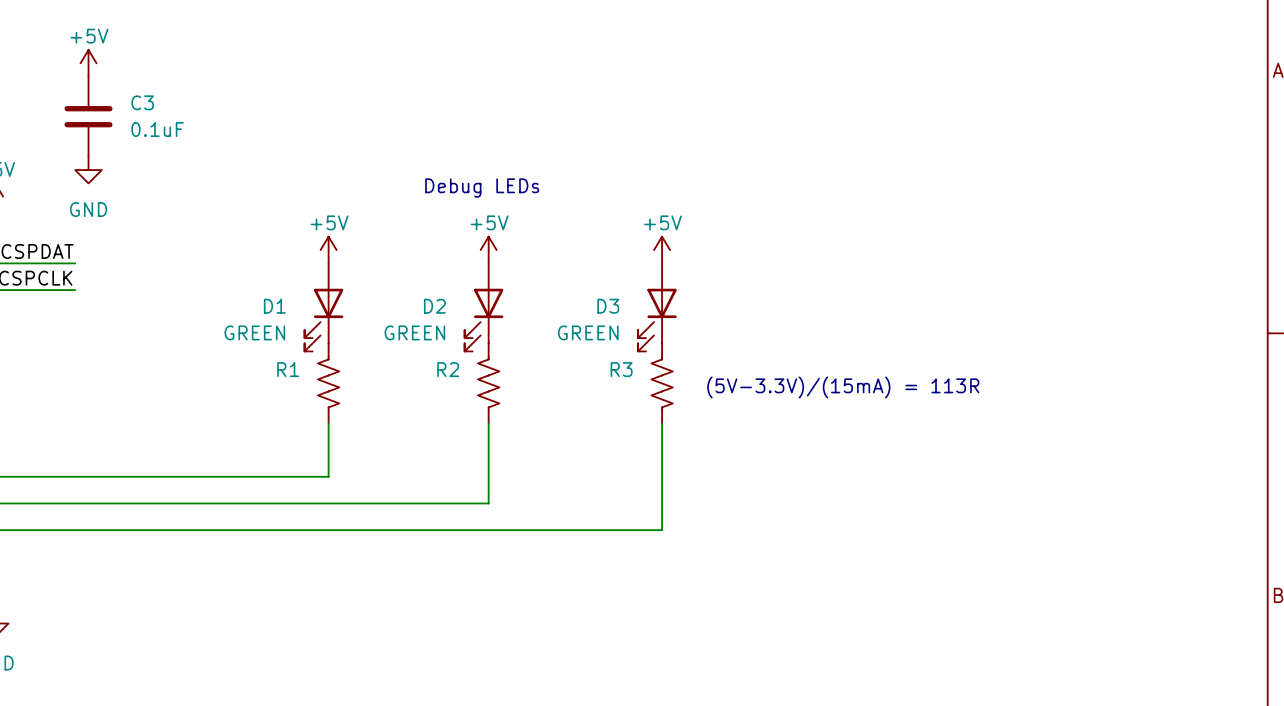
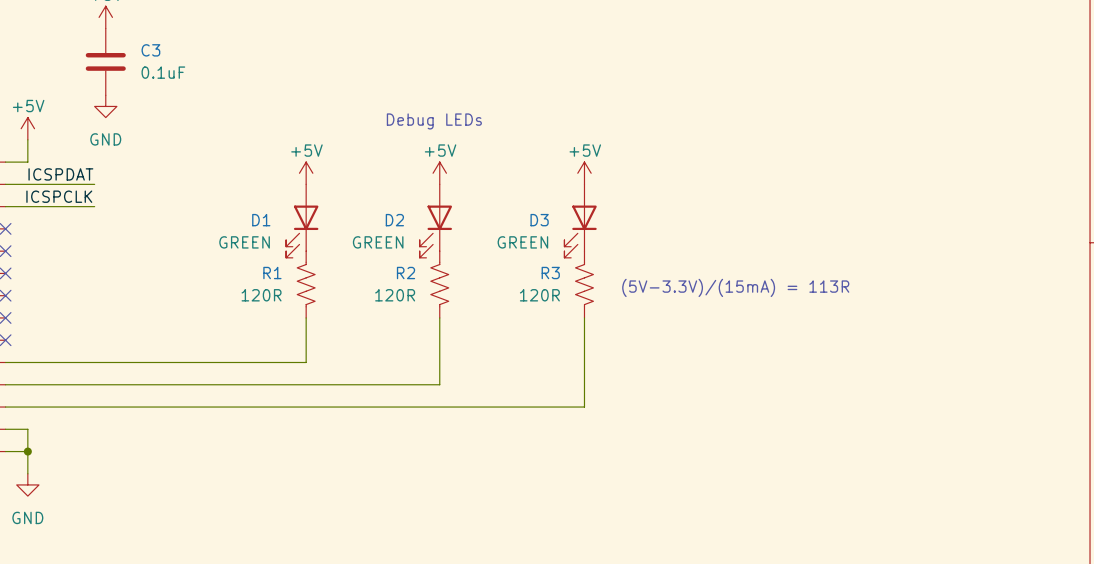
R1 value: none -> 120R (261, 295)
R2 value: none -> 120R (395, 295)
R3 value: none -> 120R (539, 295)

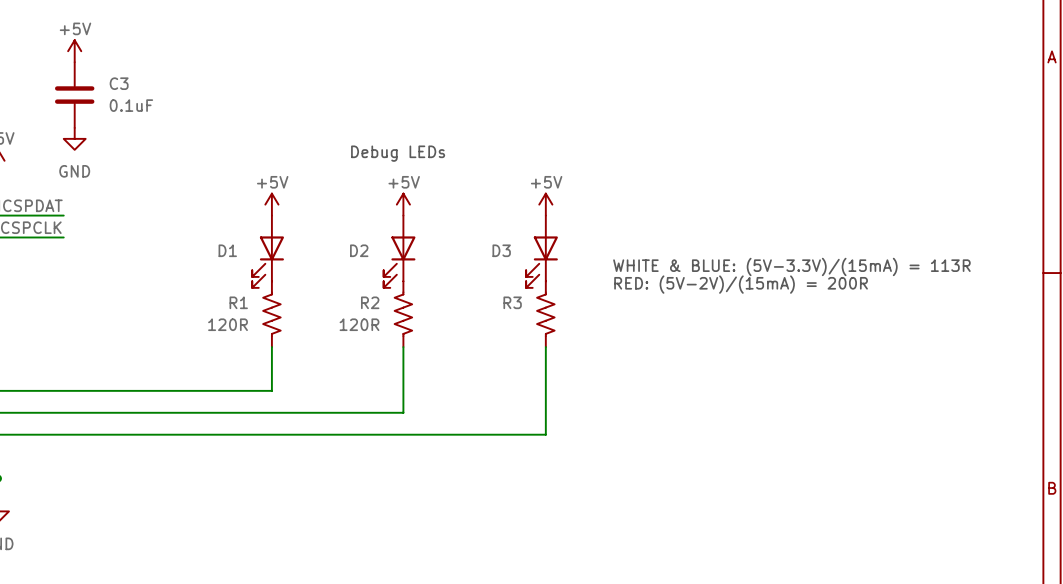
text: none -> WHITE & BLUE: (5V-3.3V)/(15mA) = 113R (791, 266)
D1 value: GREEN (244, 242) -> none
D2 value: GREEN (378, 242) -> none
D3 value: GREEN (522, 242) -> none
text: none -> RED: (5V-2V)/(15mA) = 200R (741, 284)
text: (5V-3.3V)/(15mA) = 113R (735, 287) -> none
R3 value: 120R (539, 295) -> none

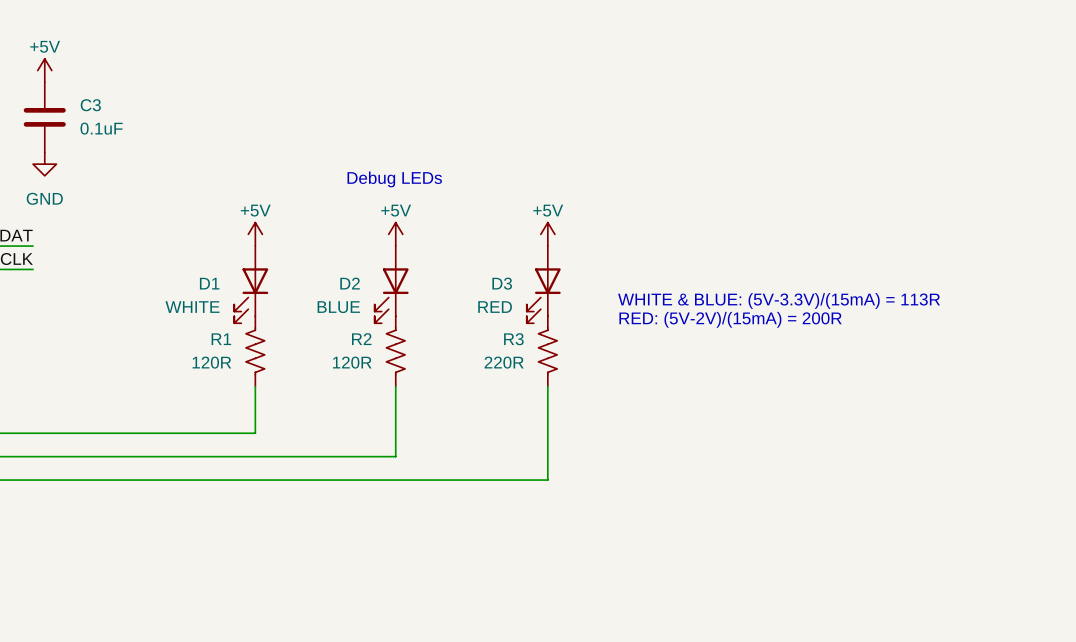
D1 value: none -> WHITE (192, 307)
D2 value: none -> BLUE (338, 307)
D3 value: none -> RED (495, 307)
R3 value: none -> 220R (504, 362)

